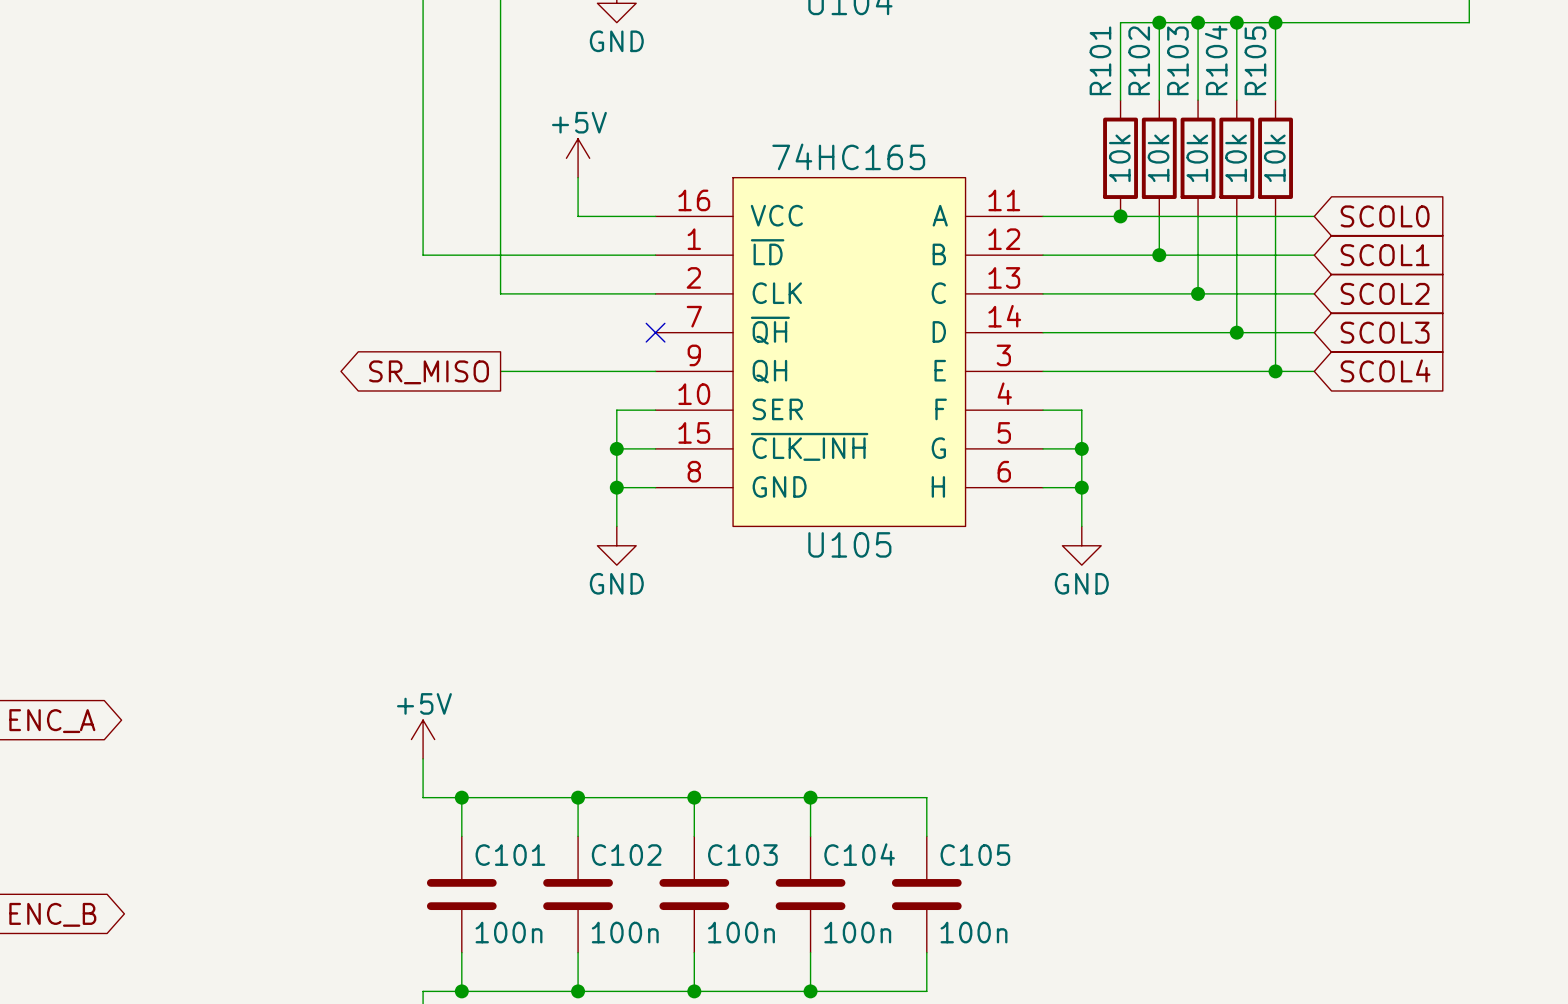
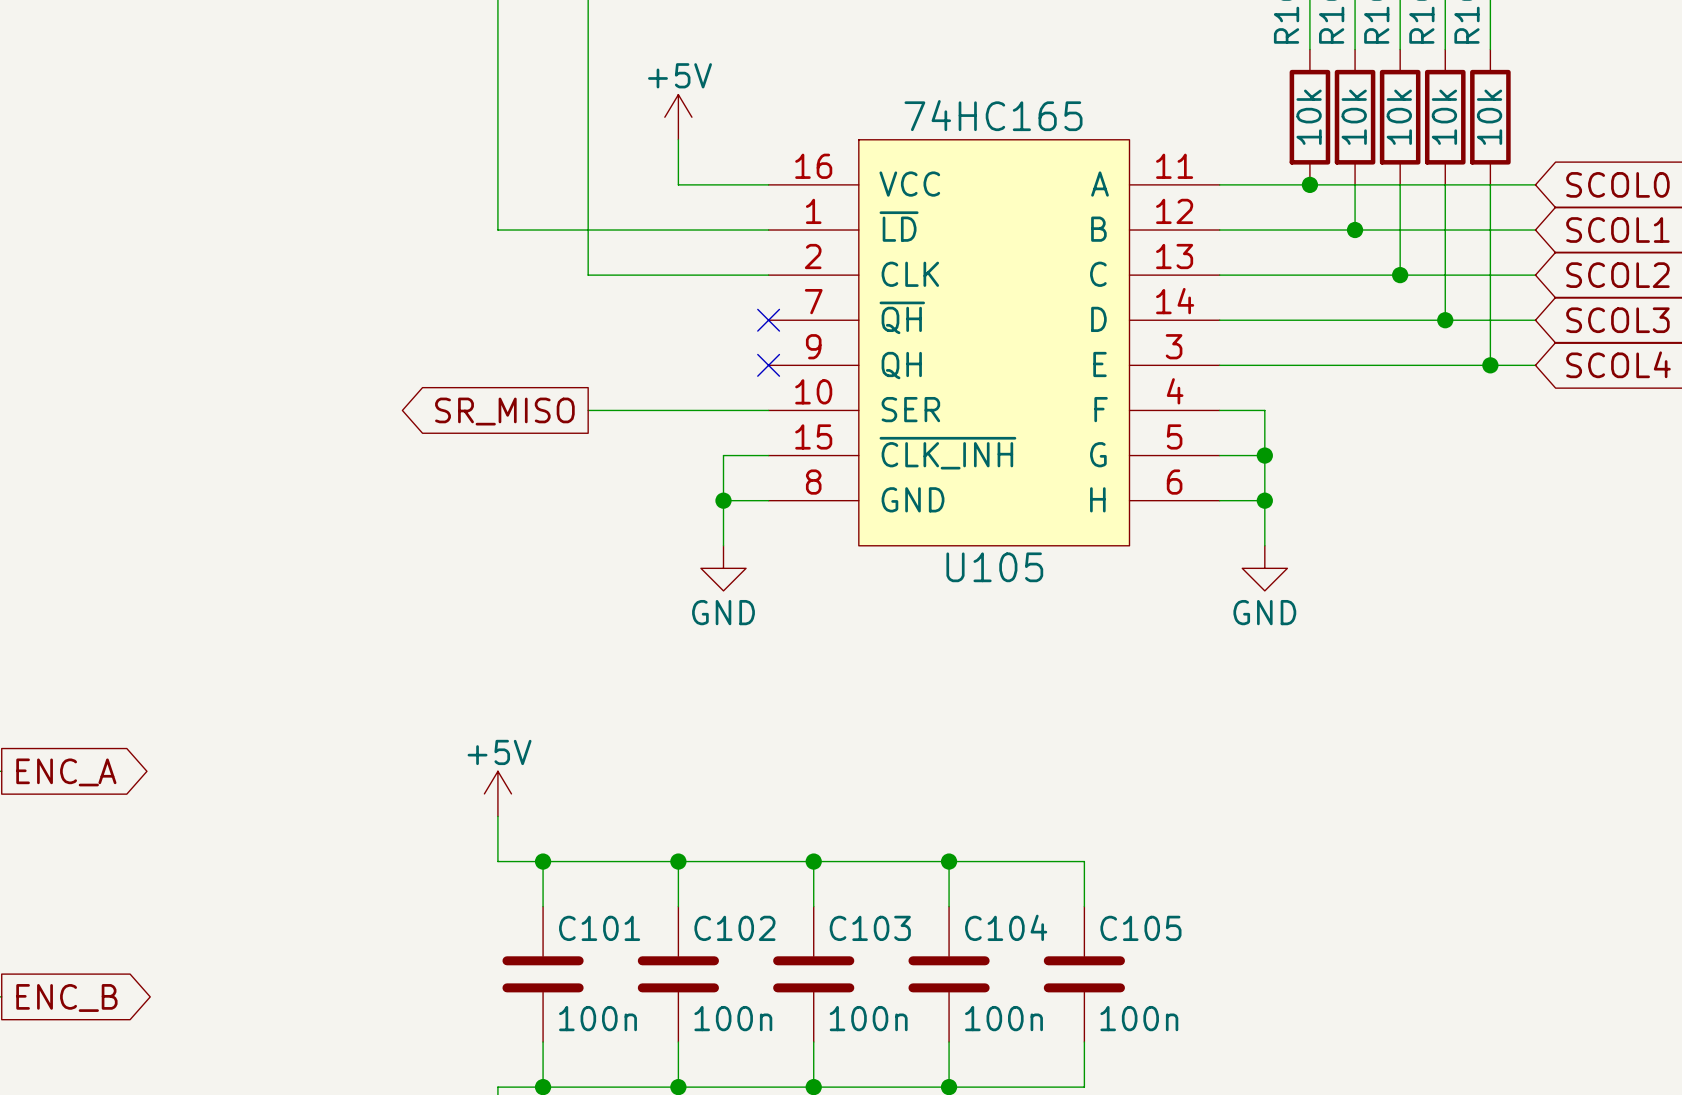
wire: (500, 371) (655, 371) -> none
no-connect mark: none -> (768, 365)
global label position: SR_MISO (429, 372) -> SR_MISO (504, 411)
wire: (616, 410) (616, 448) -> (723, 410) (588, 410)
junction: (616, 448) -> none

